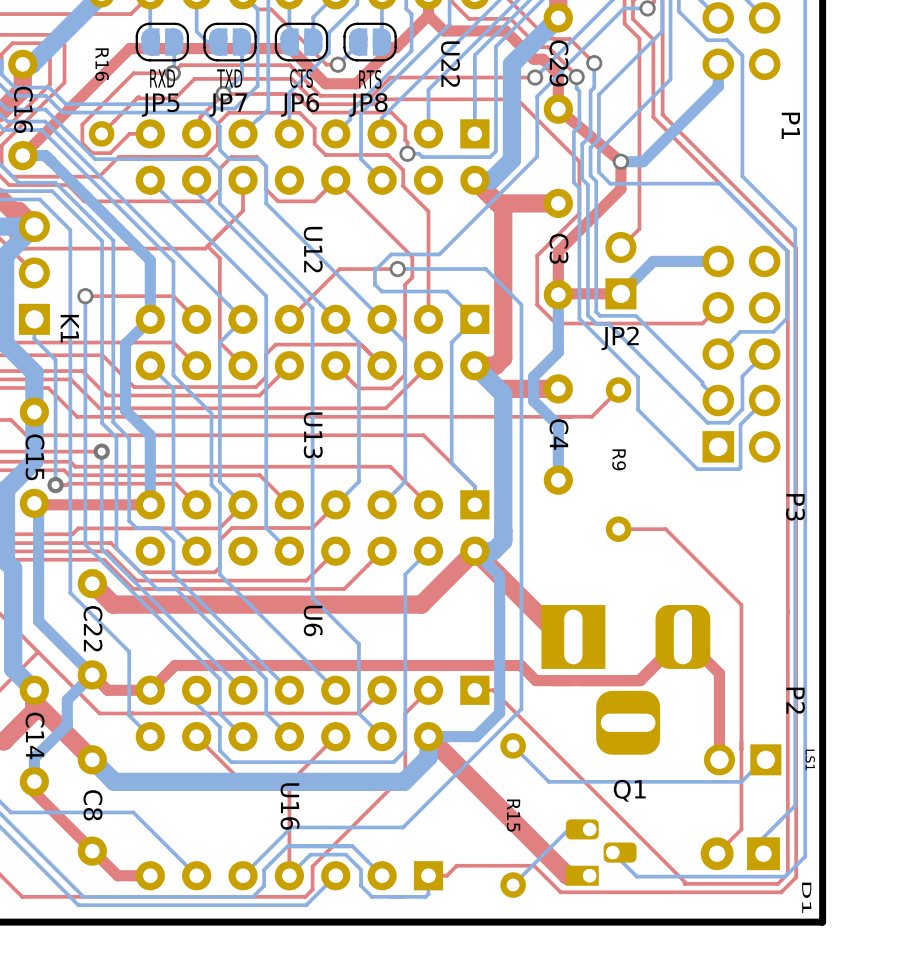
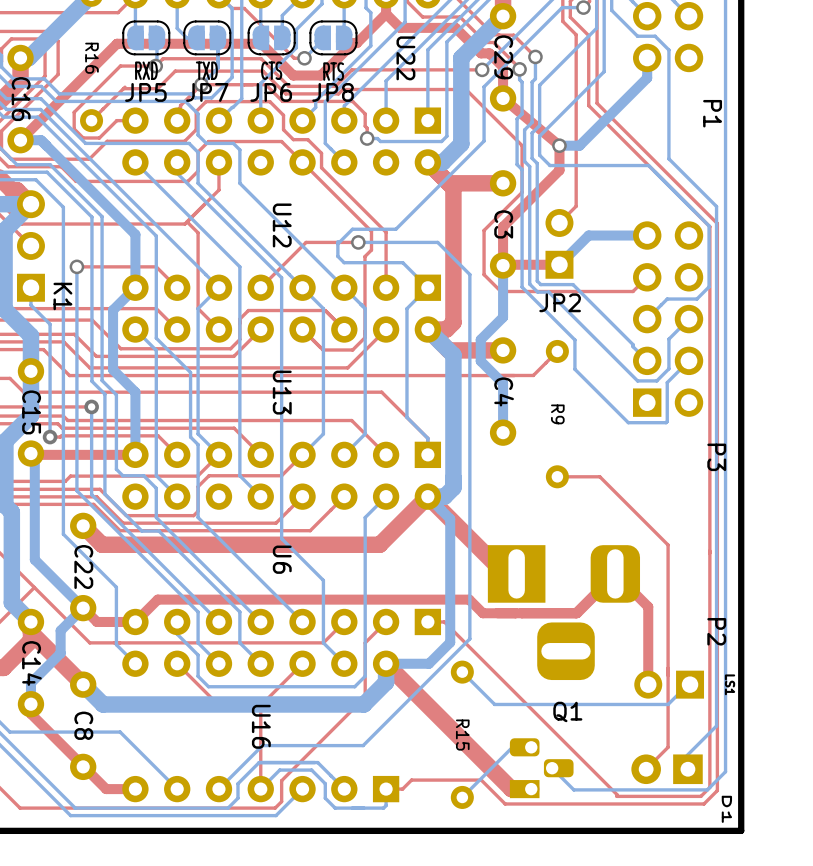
top track: (341, 154) (388, 154) (403, 170) (403, 186) (428, 211) (428, 257) -> (307, 139) (321, 153) (321, 167) (386, 232)
top track: (256, 157) (266, 166) (266, 189) (278, 201) (314, 201) (335, 180) -> (231, 141) (281, 141) (302, 162)

